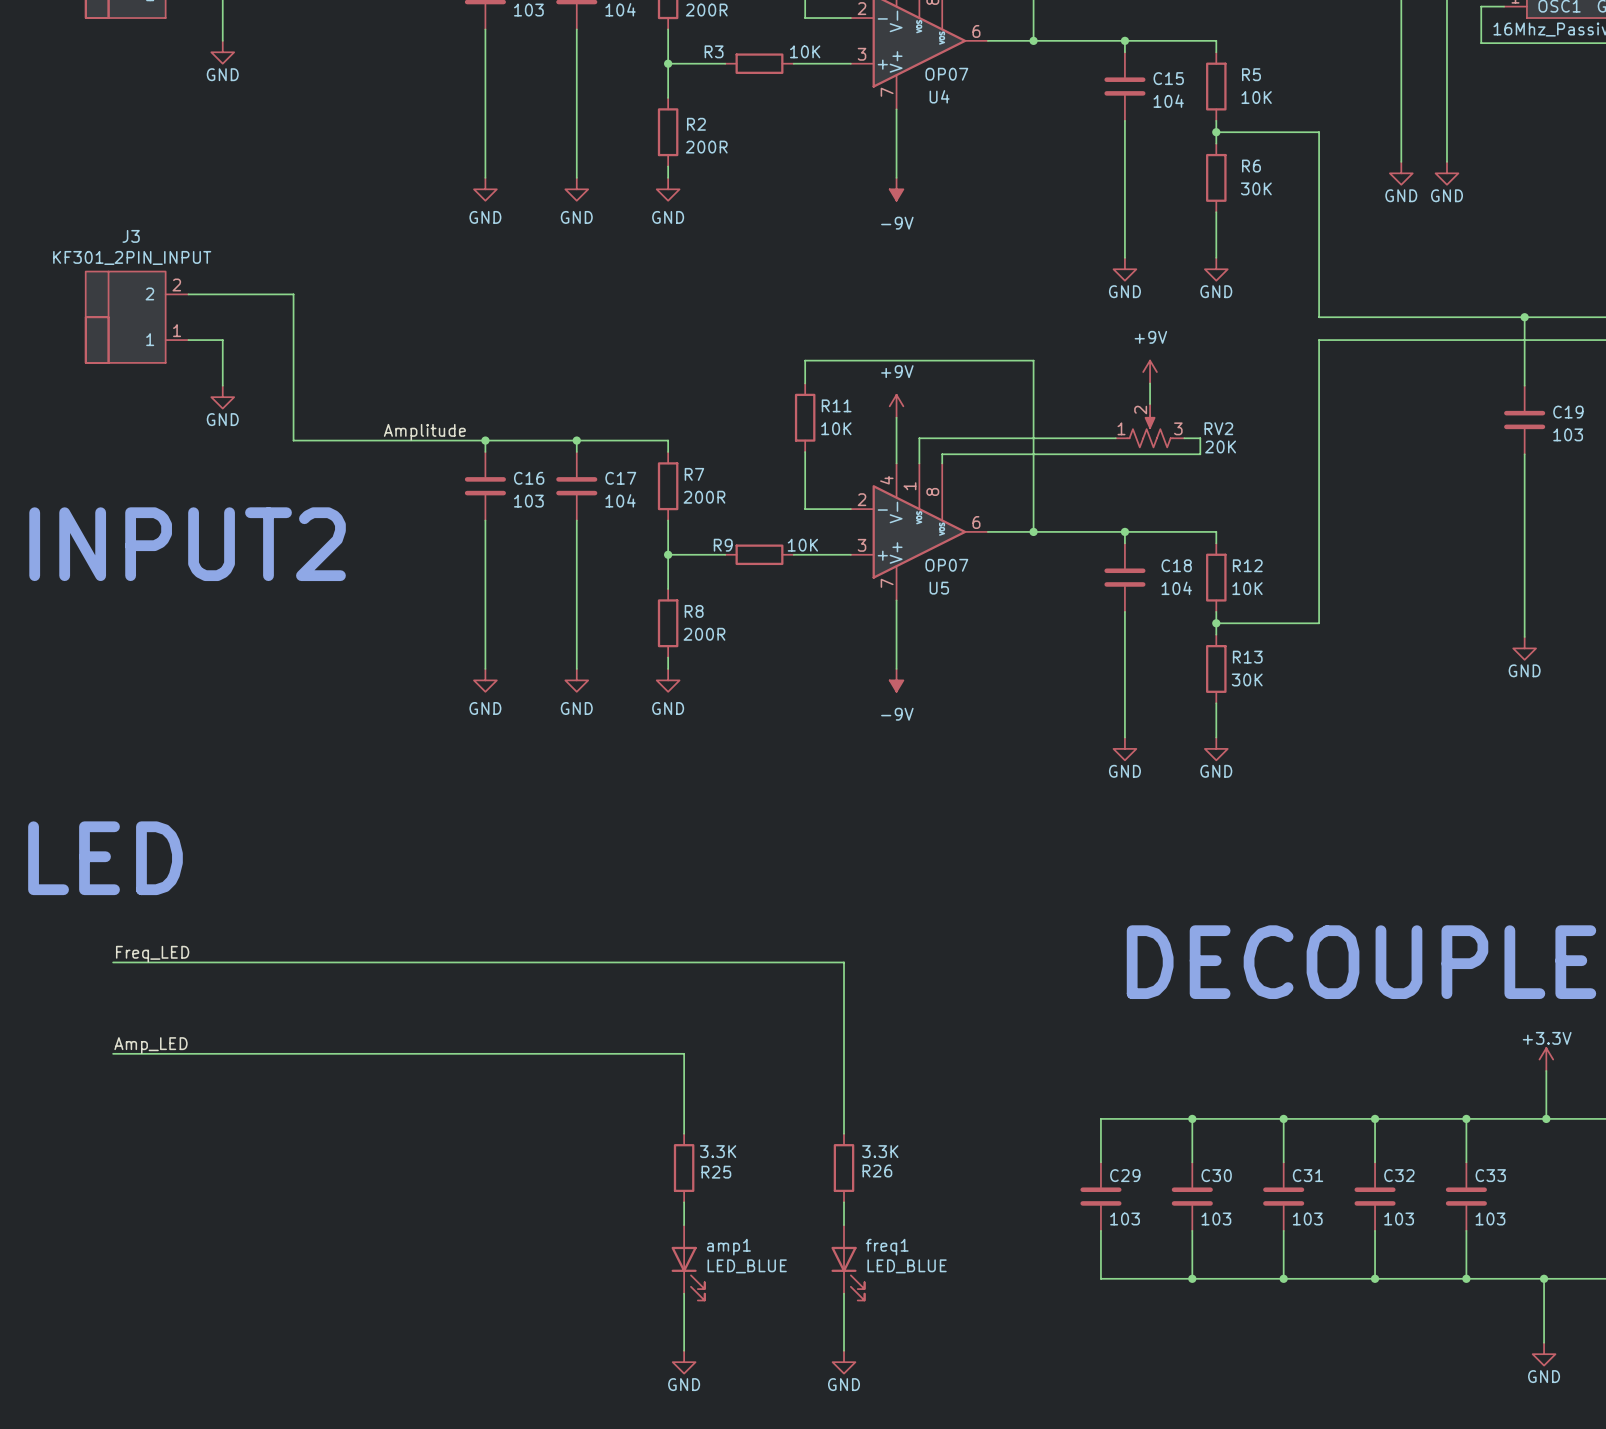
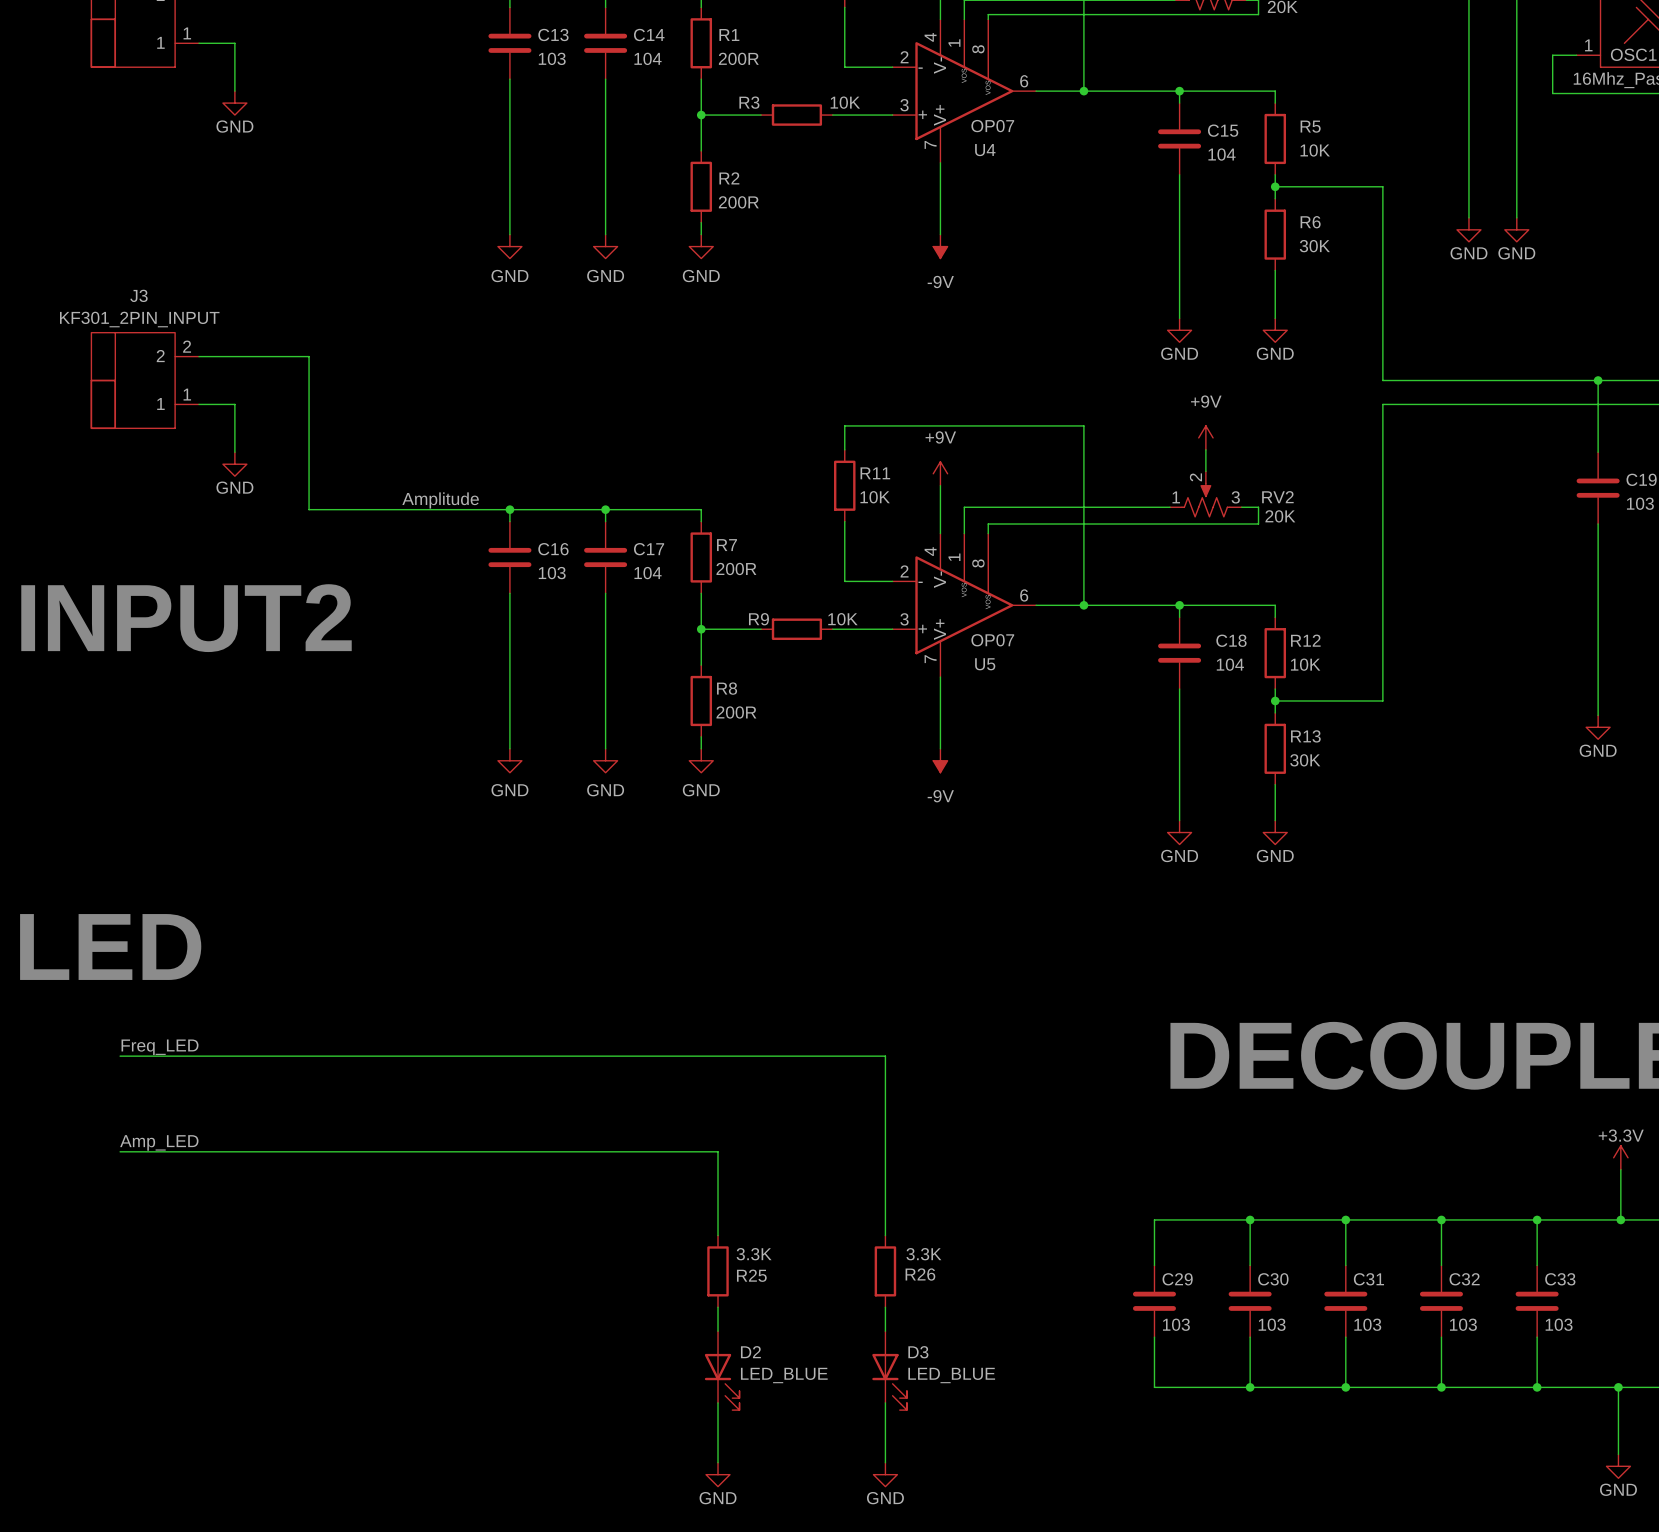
amp1 name: amp1 (728, 1247) -> D2 (750, 1352)
freq1 name: freq1 (887, 1247) -> D3 (918, 1352)

